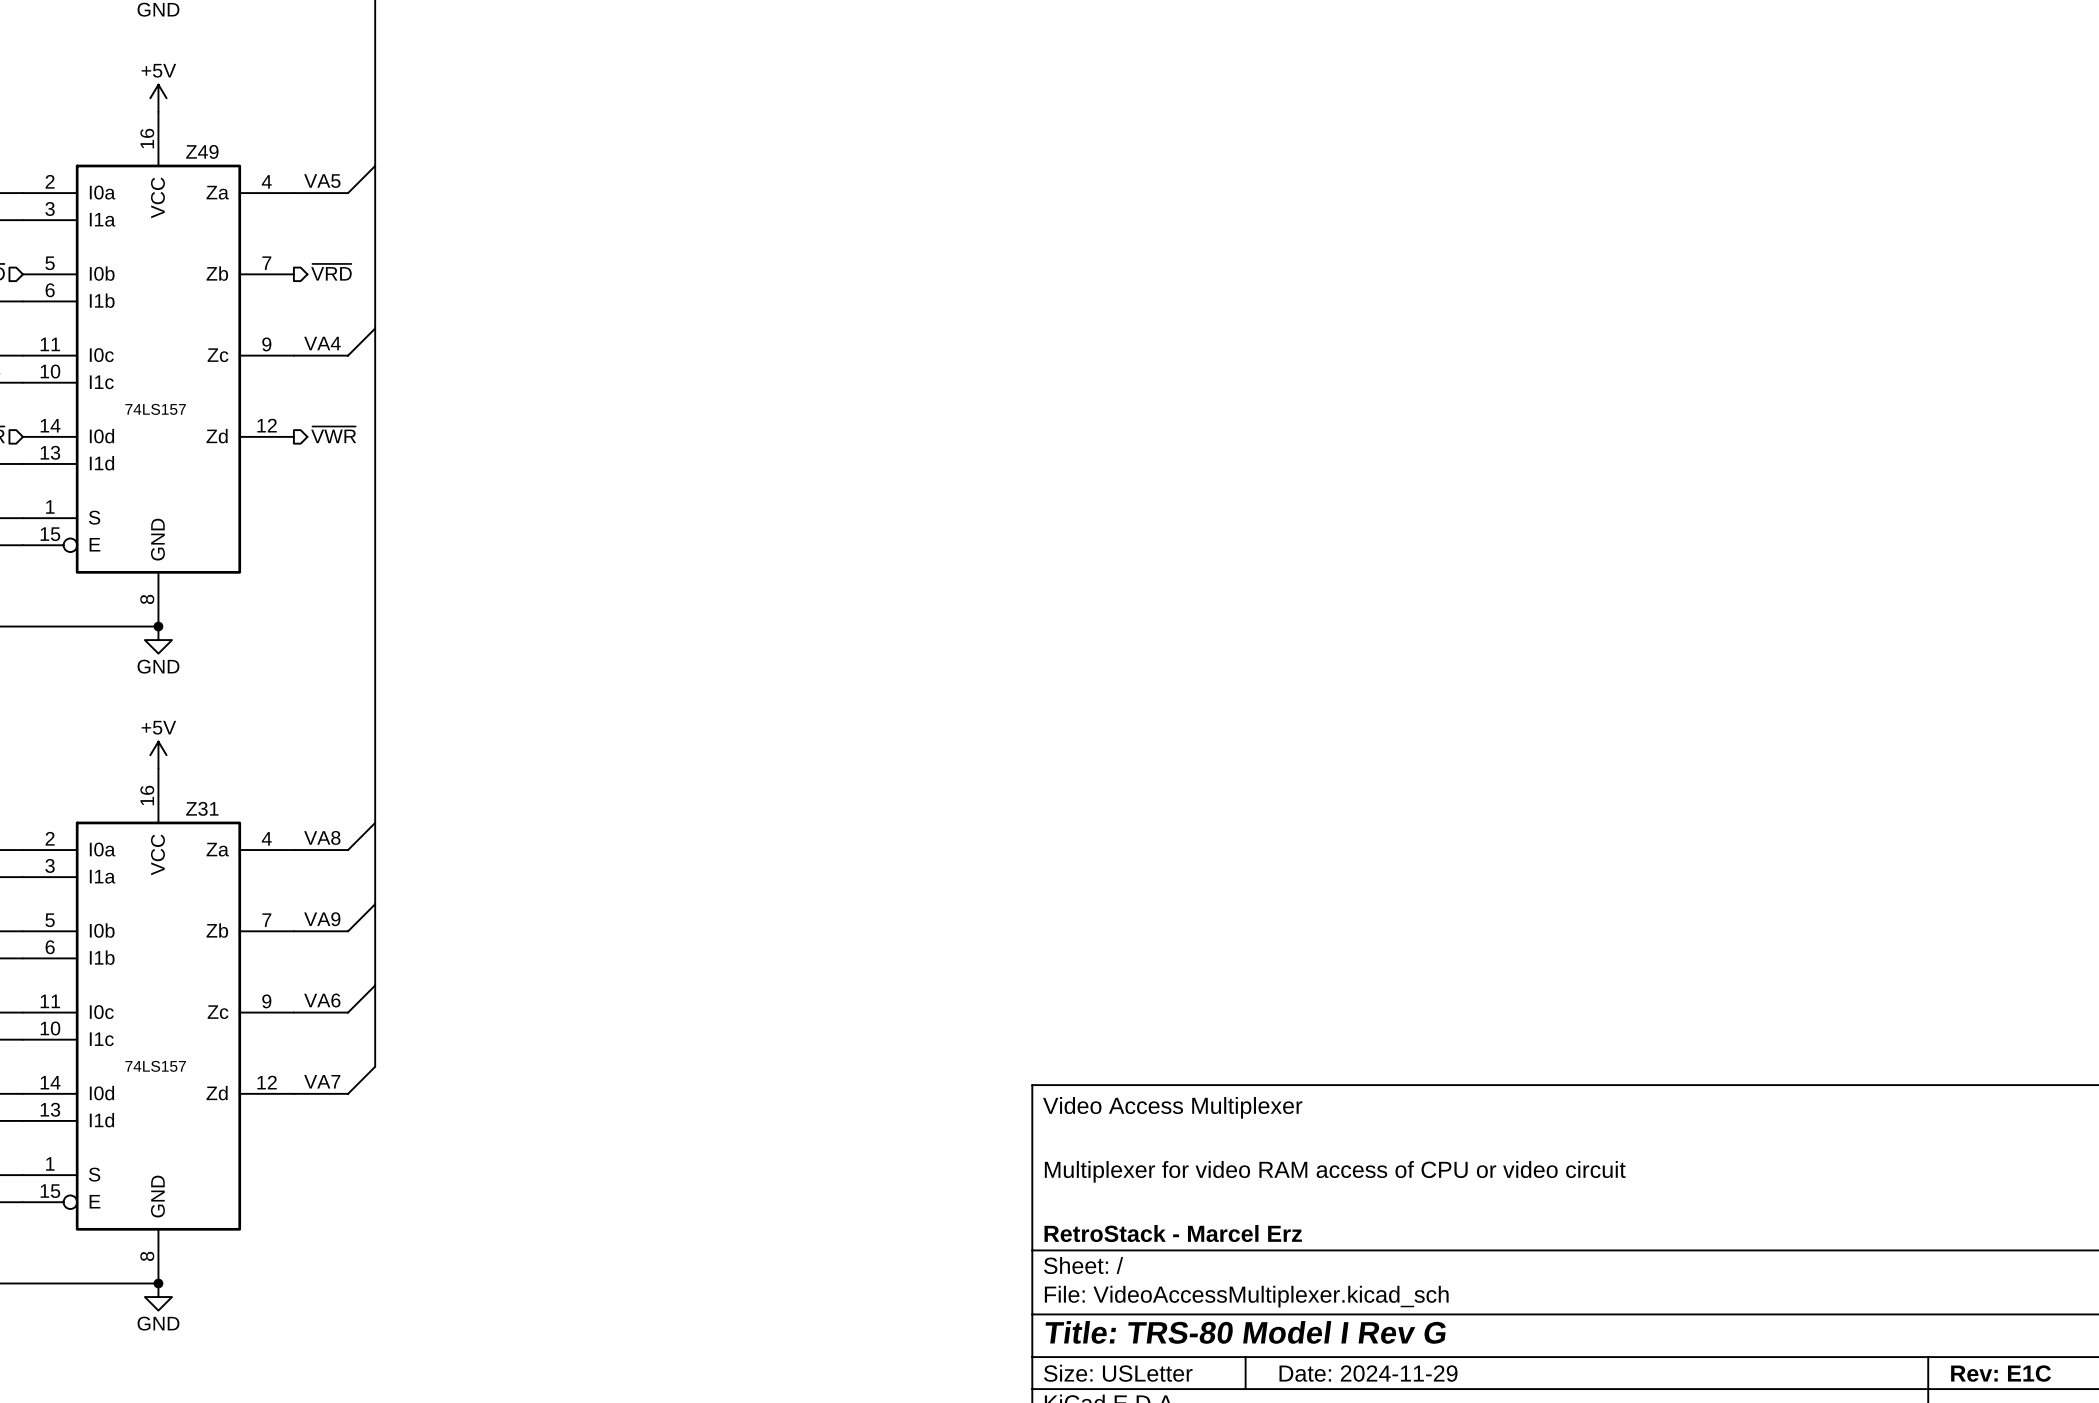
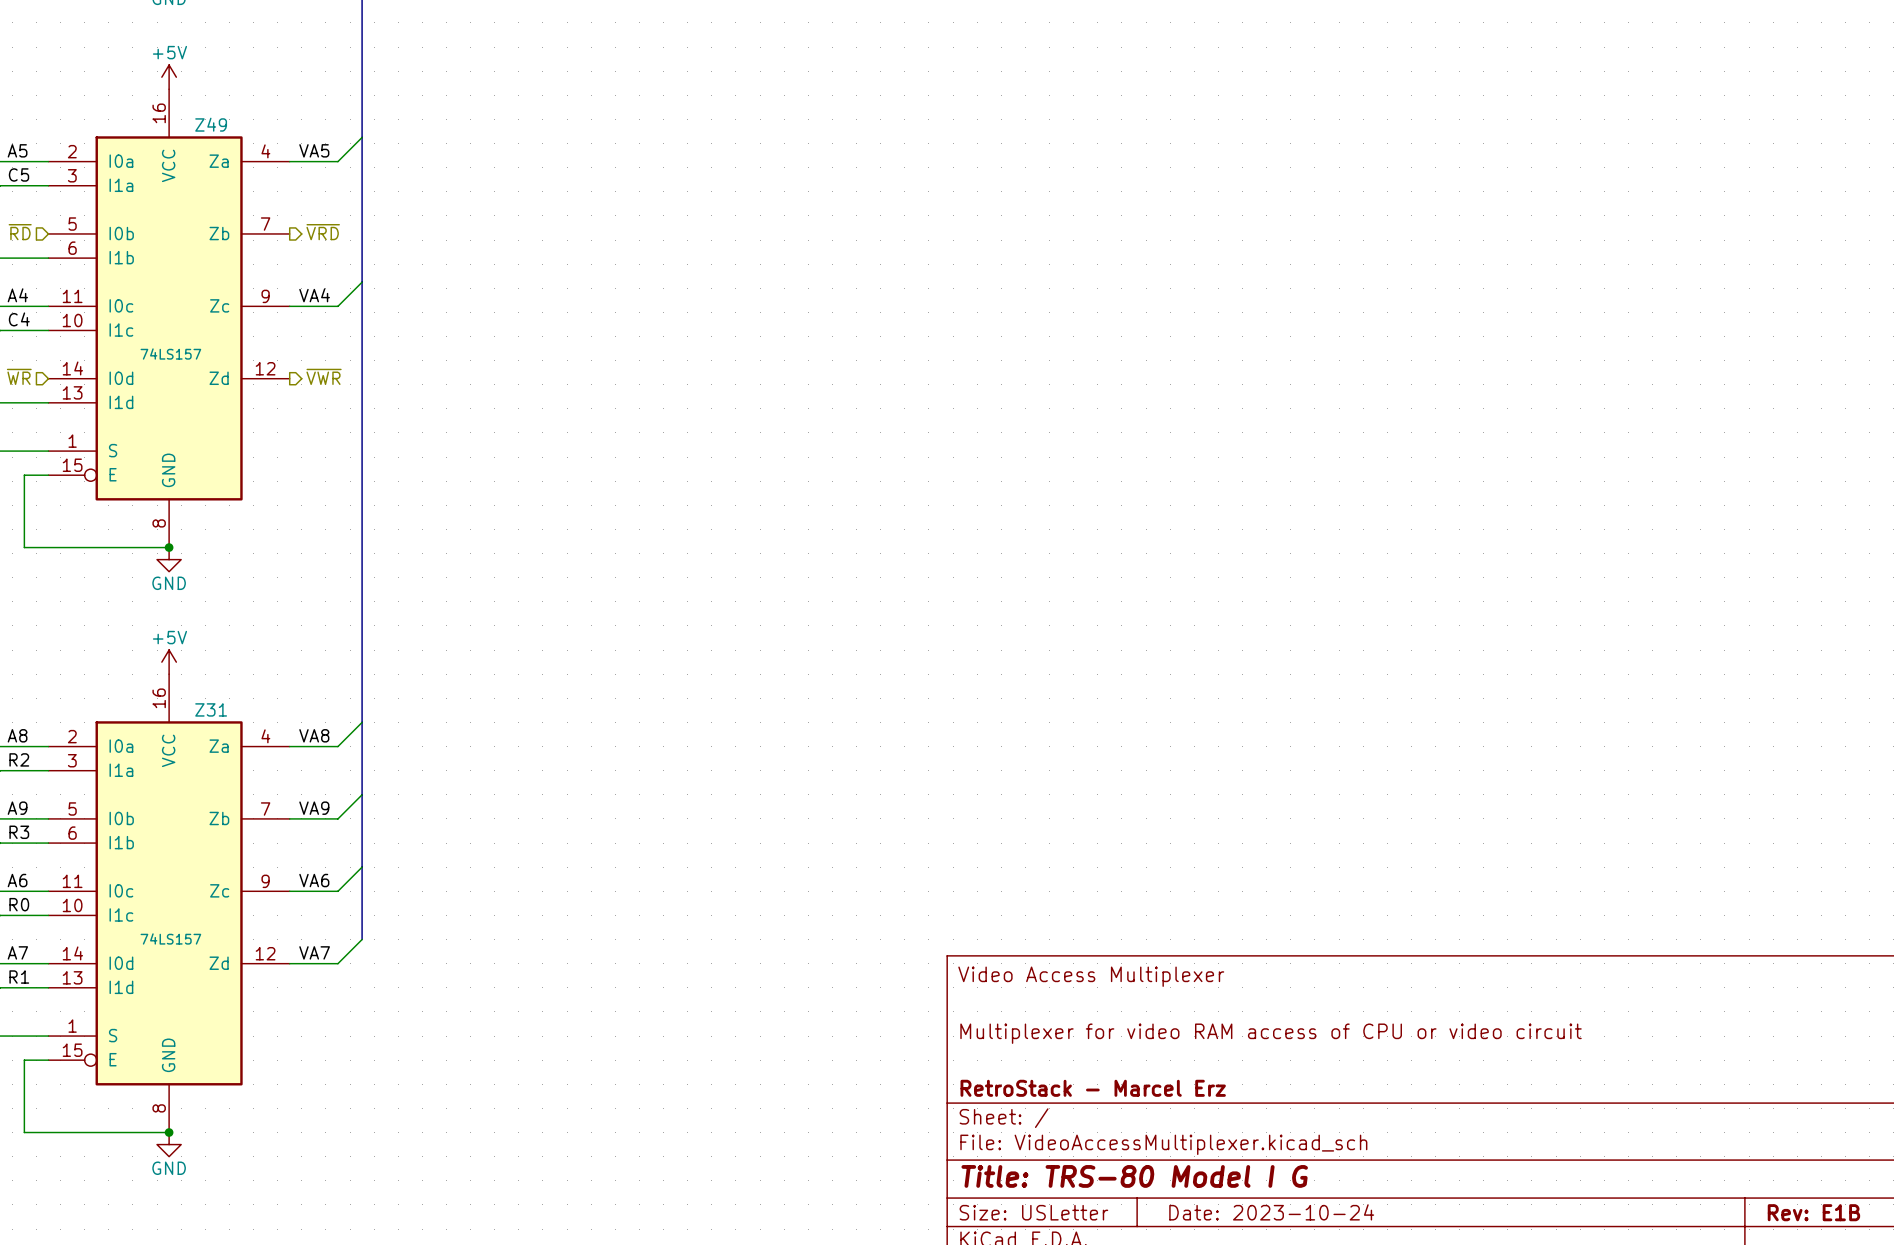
title block: Title: TRS-80 Model I Rev G (1245, 1332) -> Title: TRS-80 Model I G (1134, 1176)
title block: Date: 2024-11-29 (1368, 1373) -> Date: 2023-10-24 (1271, 1212)
title block: Rev: E1C (2001, 1373) -> Rev: E1B (1813, 1212)

